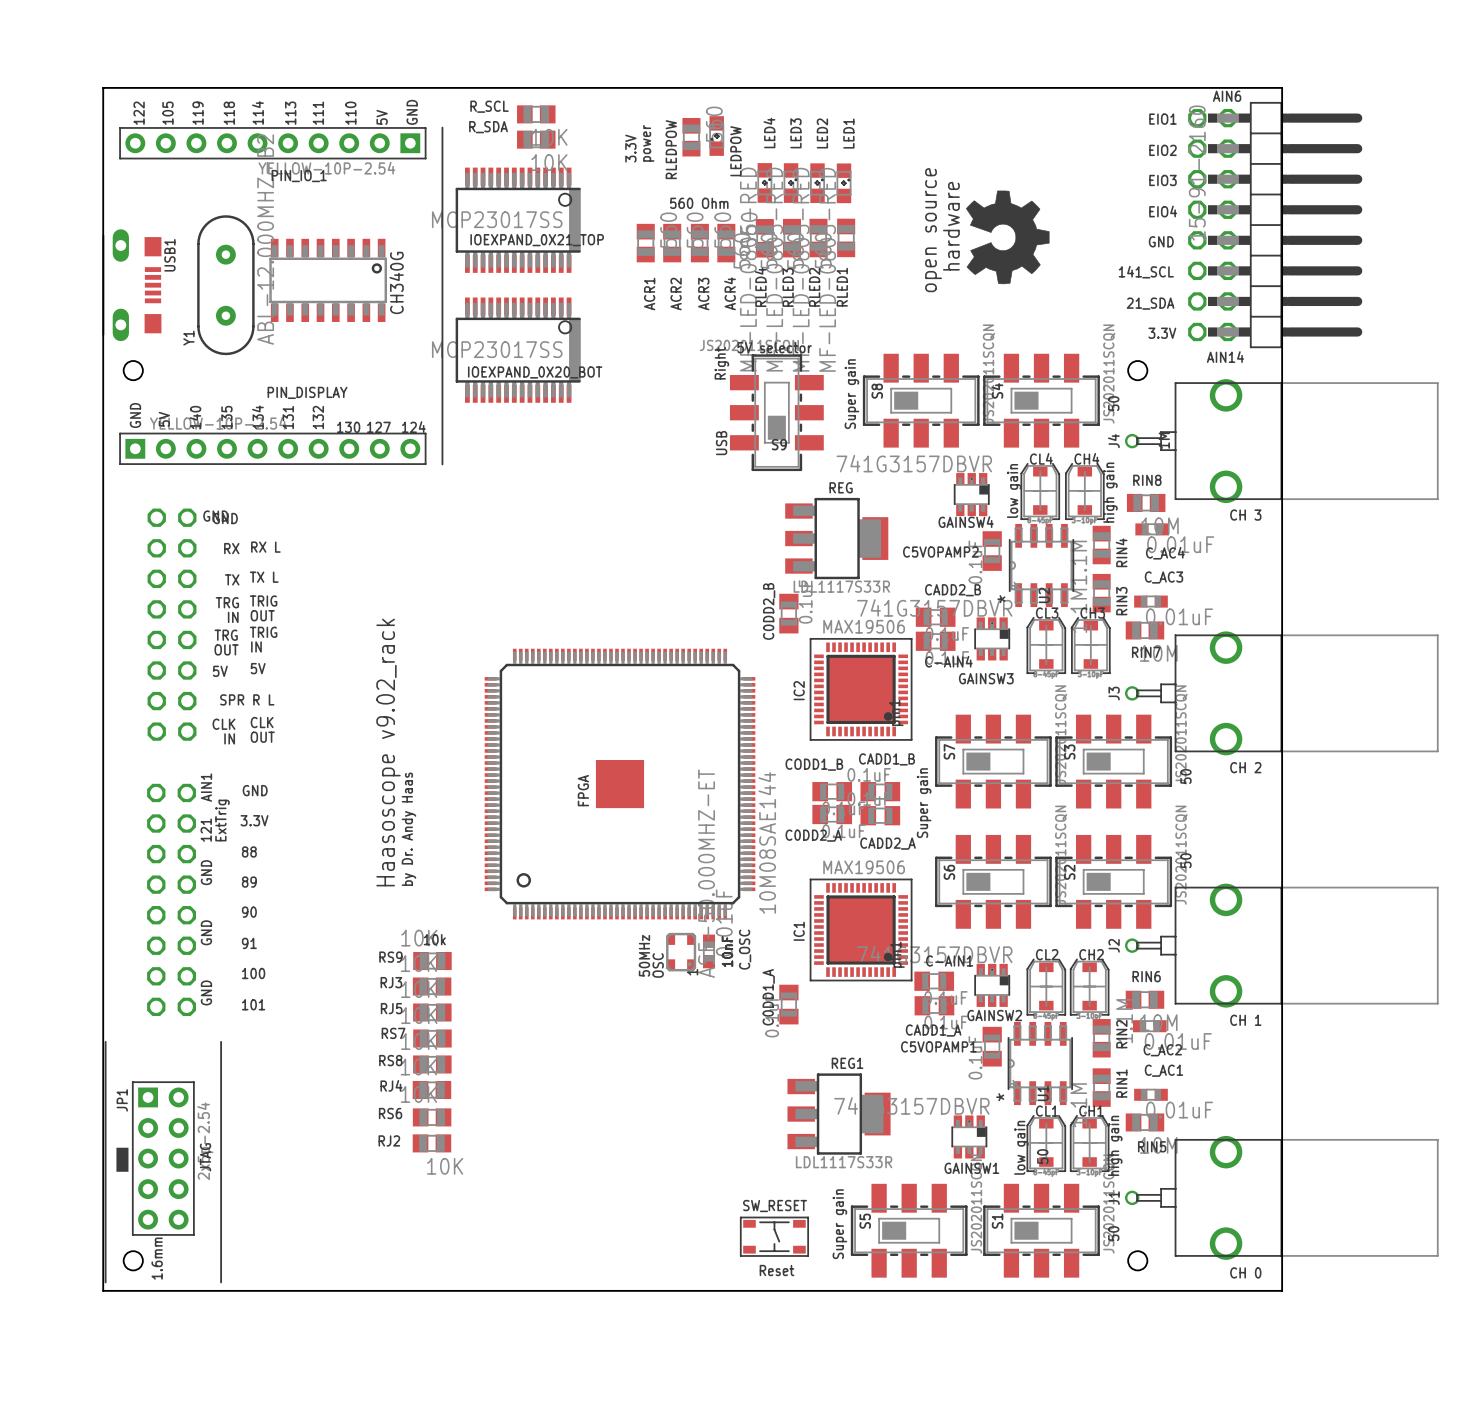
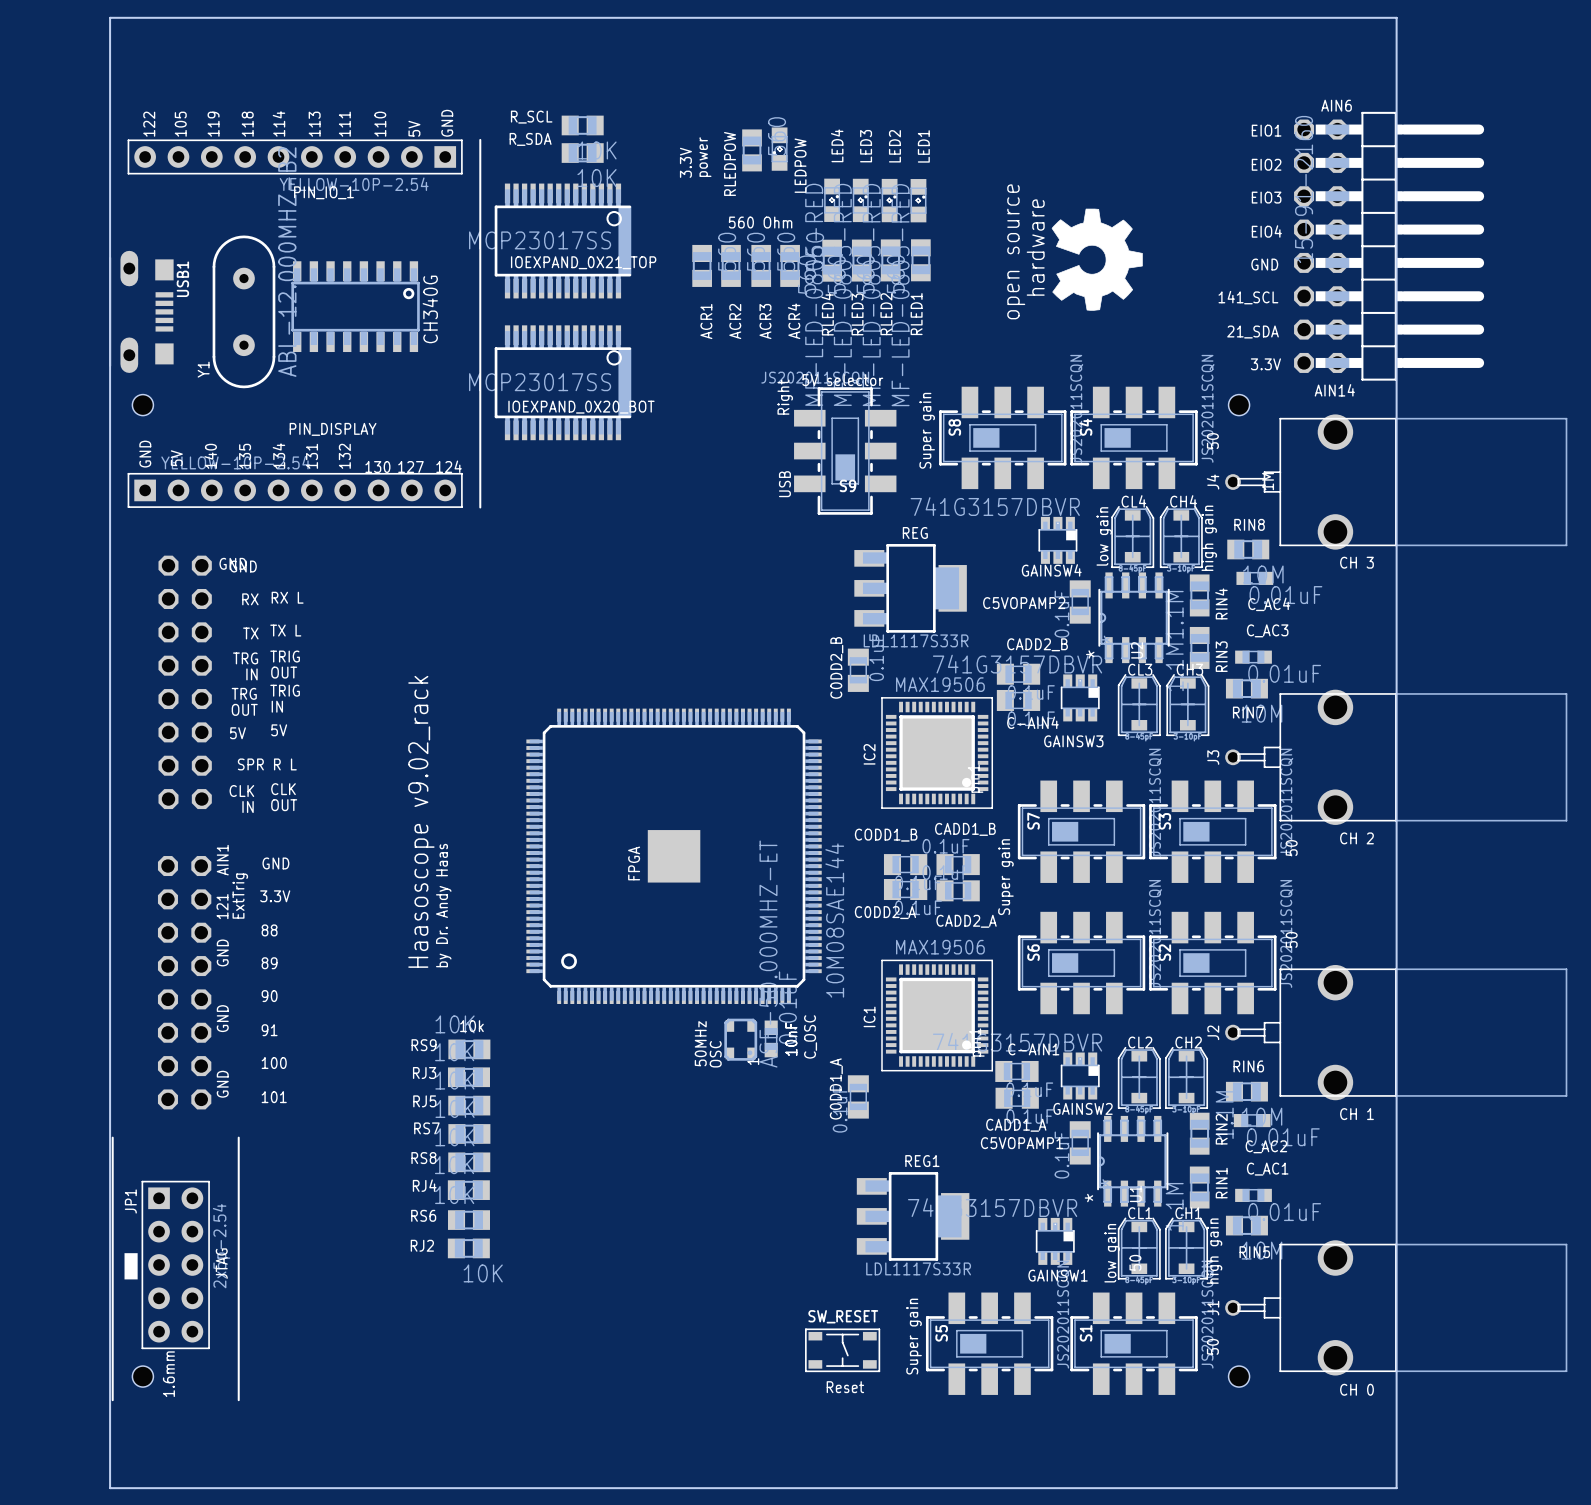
board edge: (103, 87) (1282, 87) -> (110, 96) (110, 17) (1396, 17) (1396, 96)
board edge: (103, 1290) (1282, 1290) -> (110, 1409) (110, 1488) (1396, 1488) (1396, 1409)

